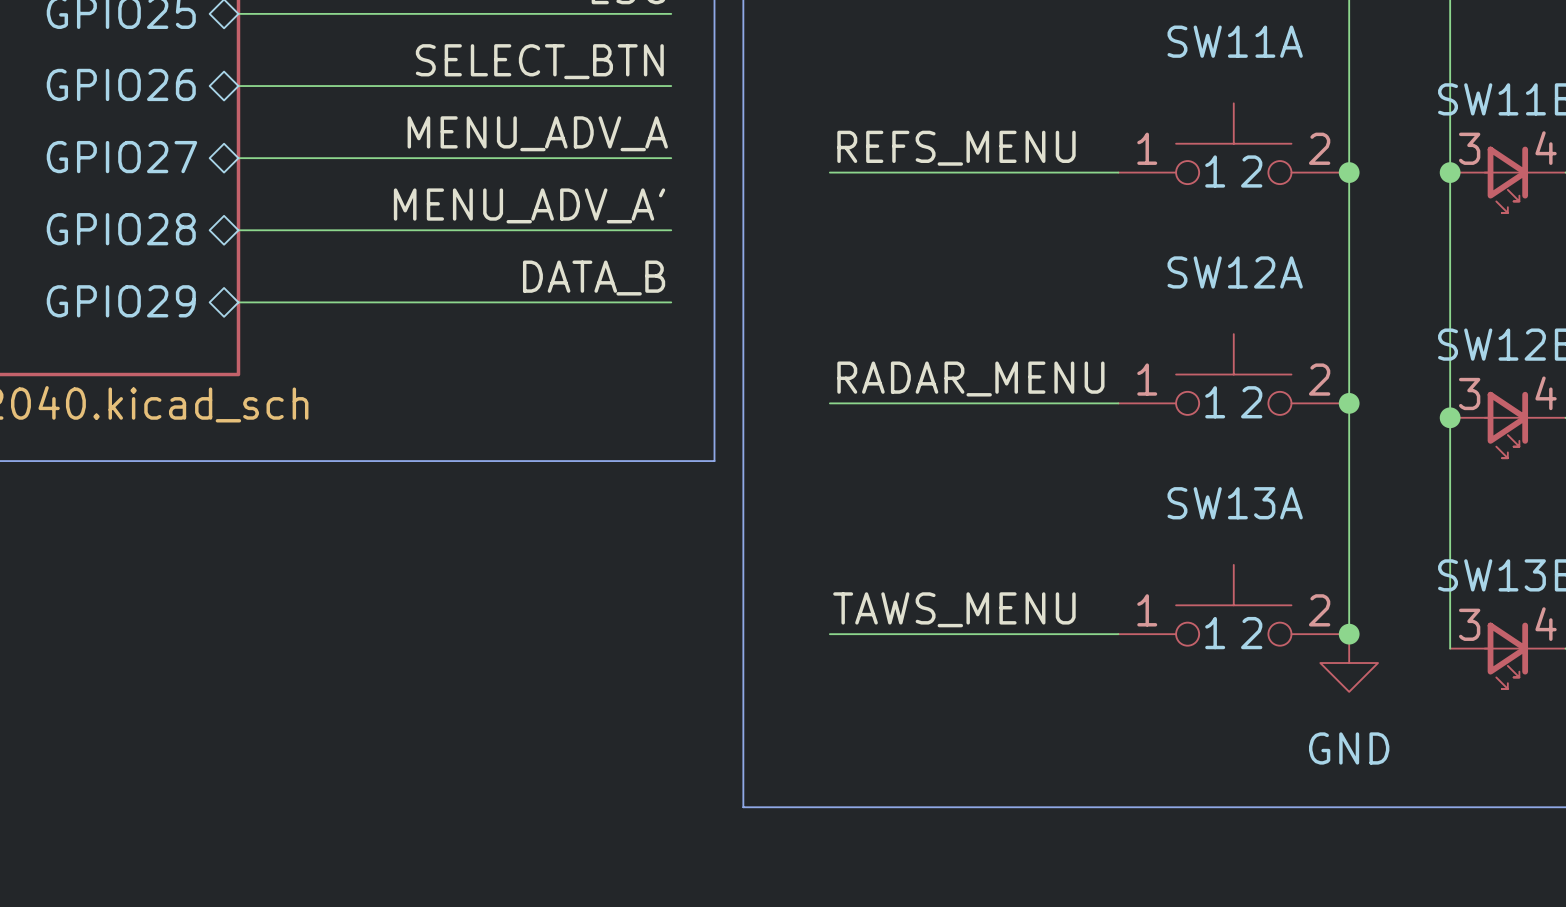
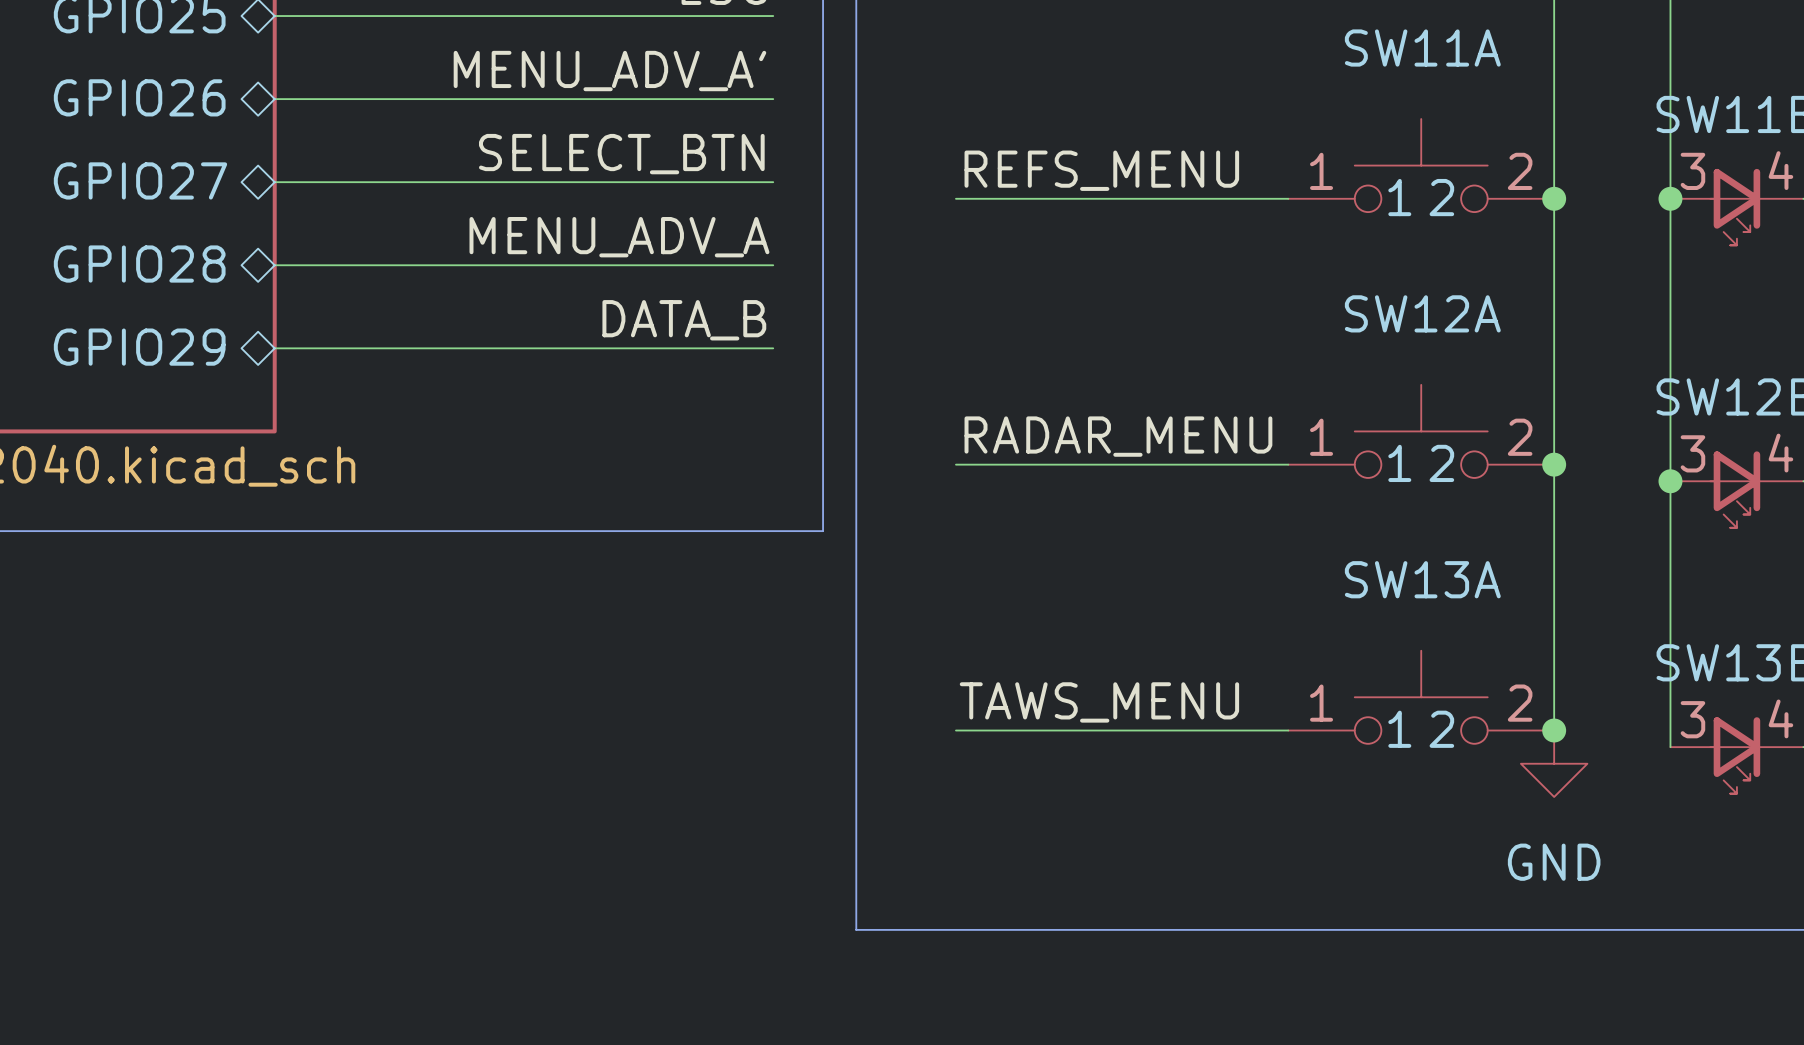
label: SELECT_BTN (539, 61) -> MENU_ADV_A' (609, 71)
label: MENU_ADV_A (537, 133) -> SELECT_BTN (621, 154)
label: MENU_ADV_A' (529, 205) -> MENU_ADV_A (619, 237)

